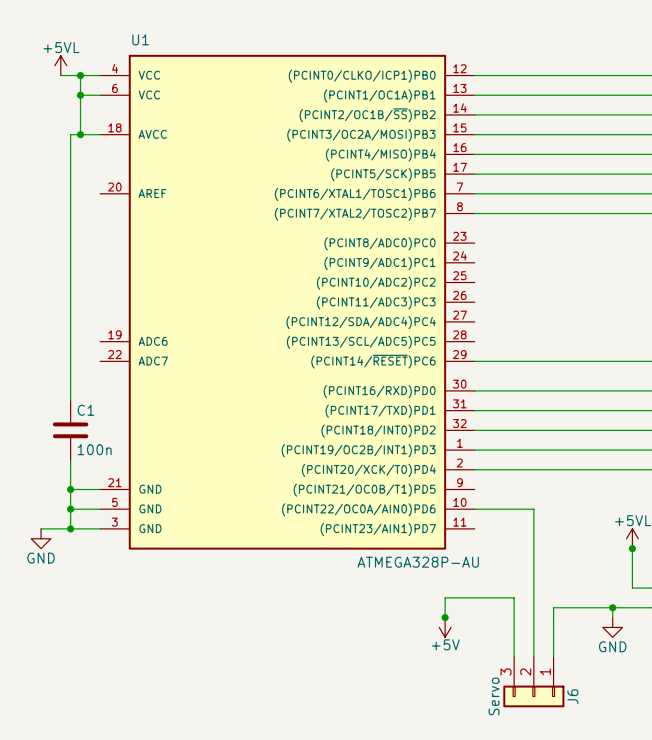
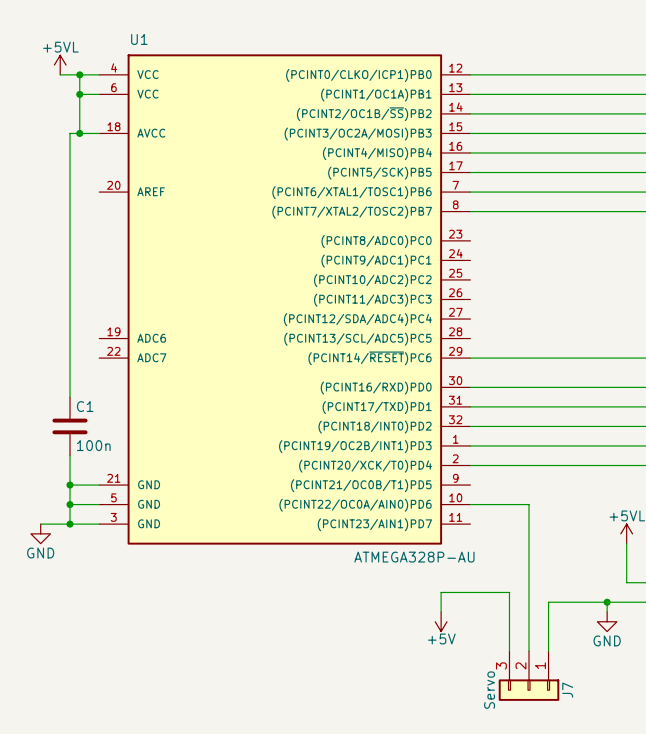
junction: (632, 548) -> none
junction: (445, 617) -> none
J6 name: J6 (572, 696) -> J7 (567, 690)

